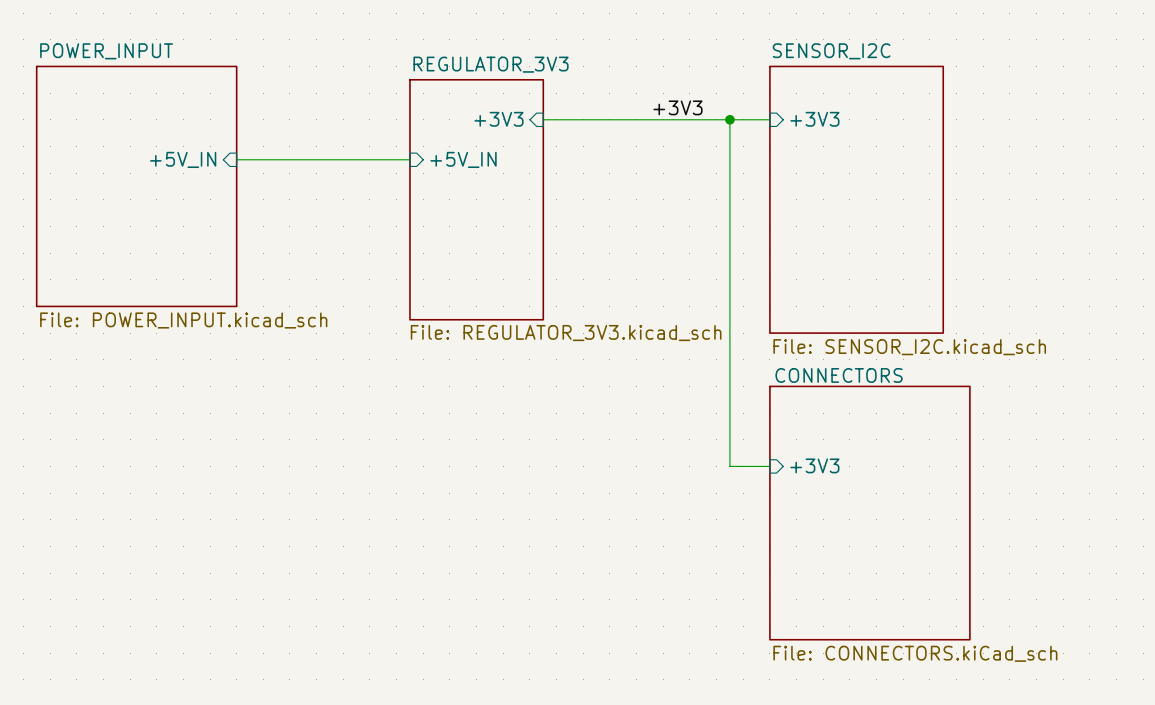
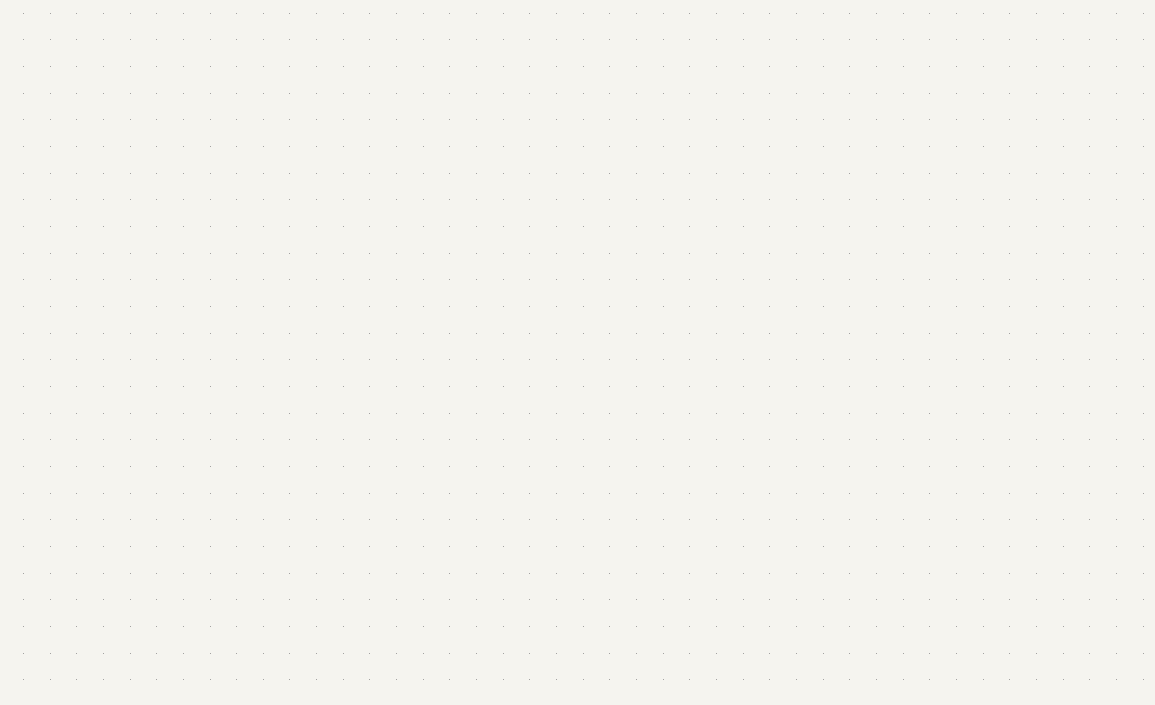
label: +3V3 (677, 107) -> none
sheet pin: +3V3 (498, 119) -> none
wire: (543, 119) (769, 119) -> none
wire: (729, 119) (729, 466) (769, 466) -> none
junction: (729, 119) -> none
sheet pin: +3V3 (814, 119) -> none
sheet pin: +5V_IN (183, 159) -> none
wire: (236, 159) (409, 159) -> none
sheet pin: +5V_IN (463, 159) -> none
sheet POWER_INPUT: File: POWER_INPUT.kicad_sch (136, 186) -> none
sheet REGULATOR_3V3: File: REGULATOR_3V3.kicad_sch (476, 199) -> none
sheet SENSOR_I2C: File: SENSOR_I2C.kicad_sch (856, 199) -> none
sheet pin: +3V3 (814, 465) -> none
sheet CONNECTORS: File: CONNECTORS.kiCad_sch (869, 513) -> none

